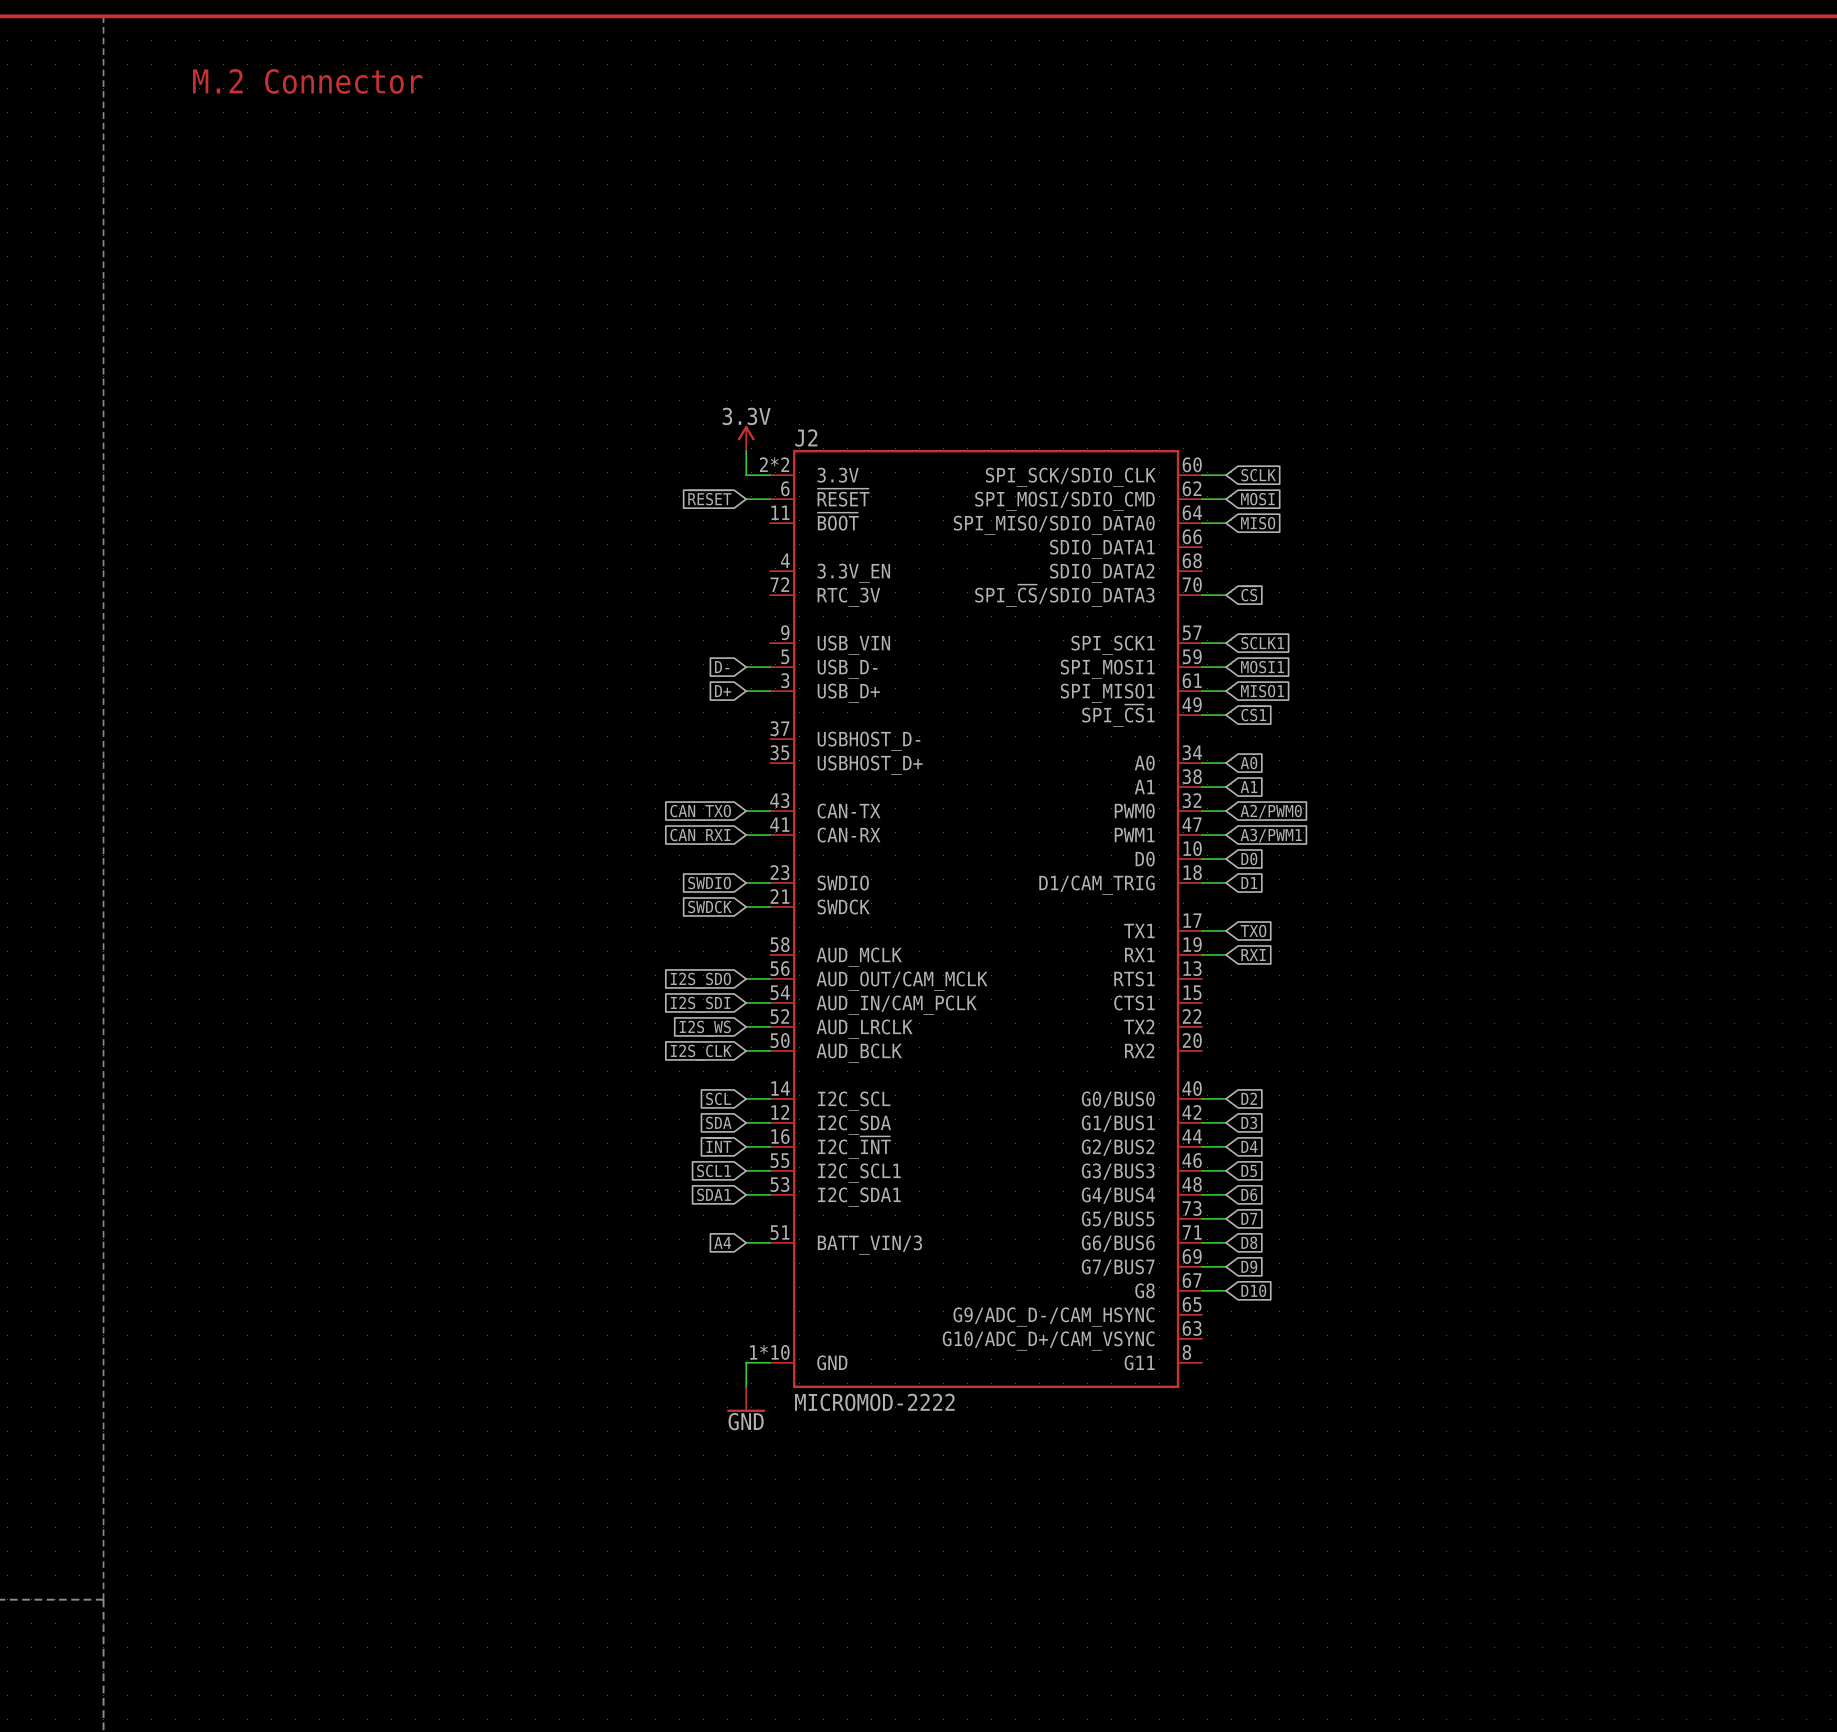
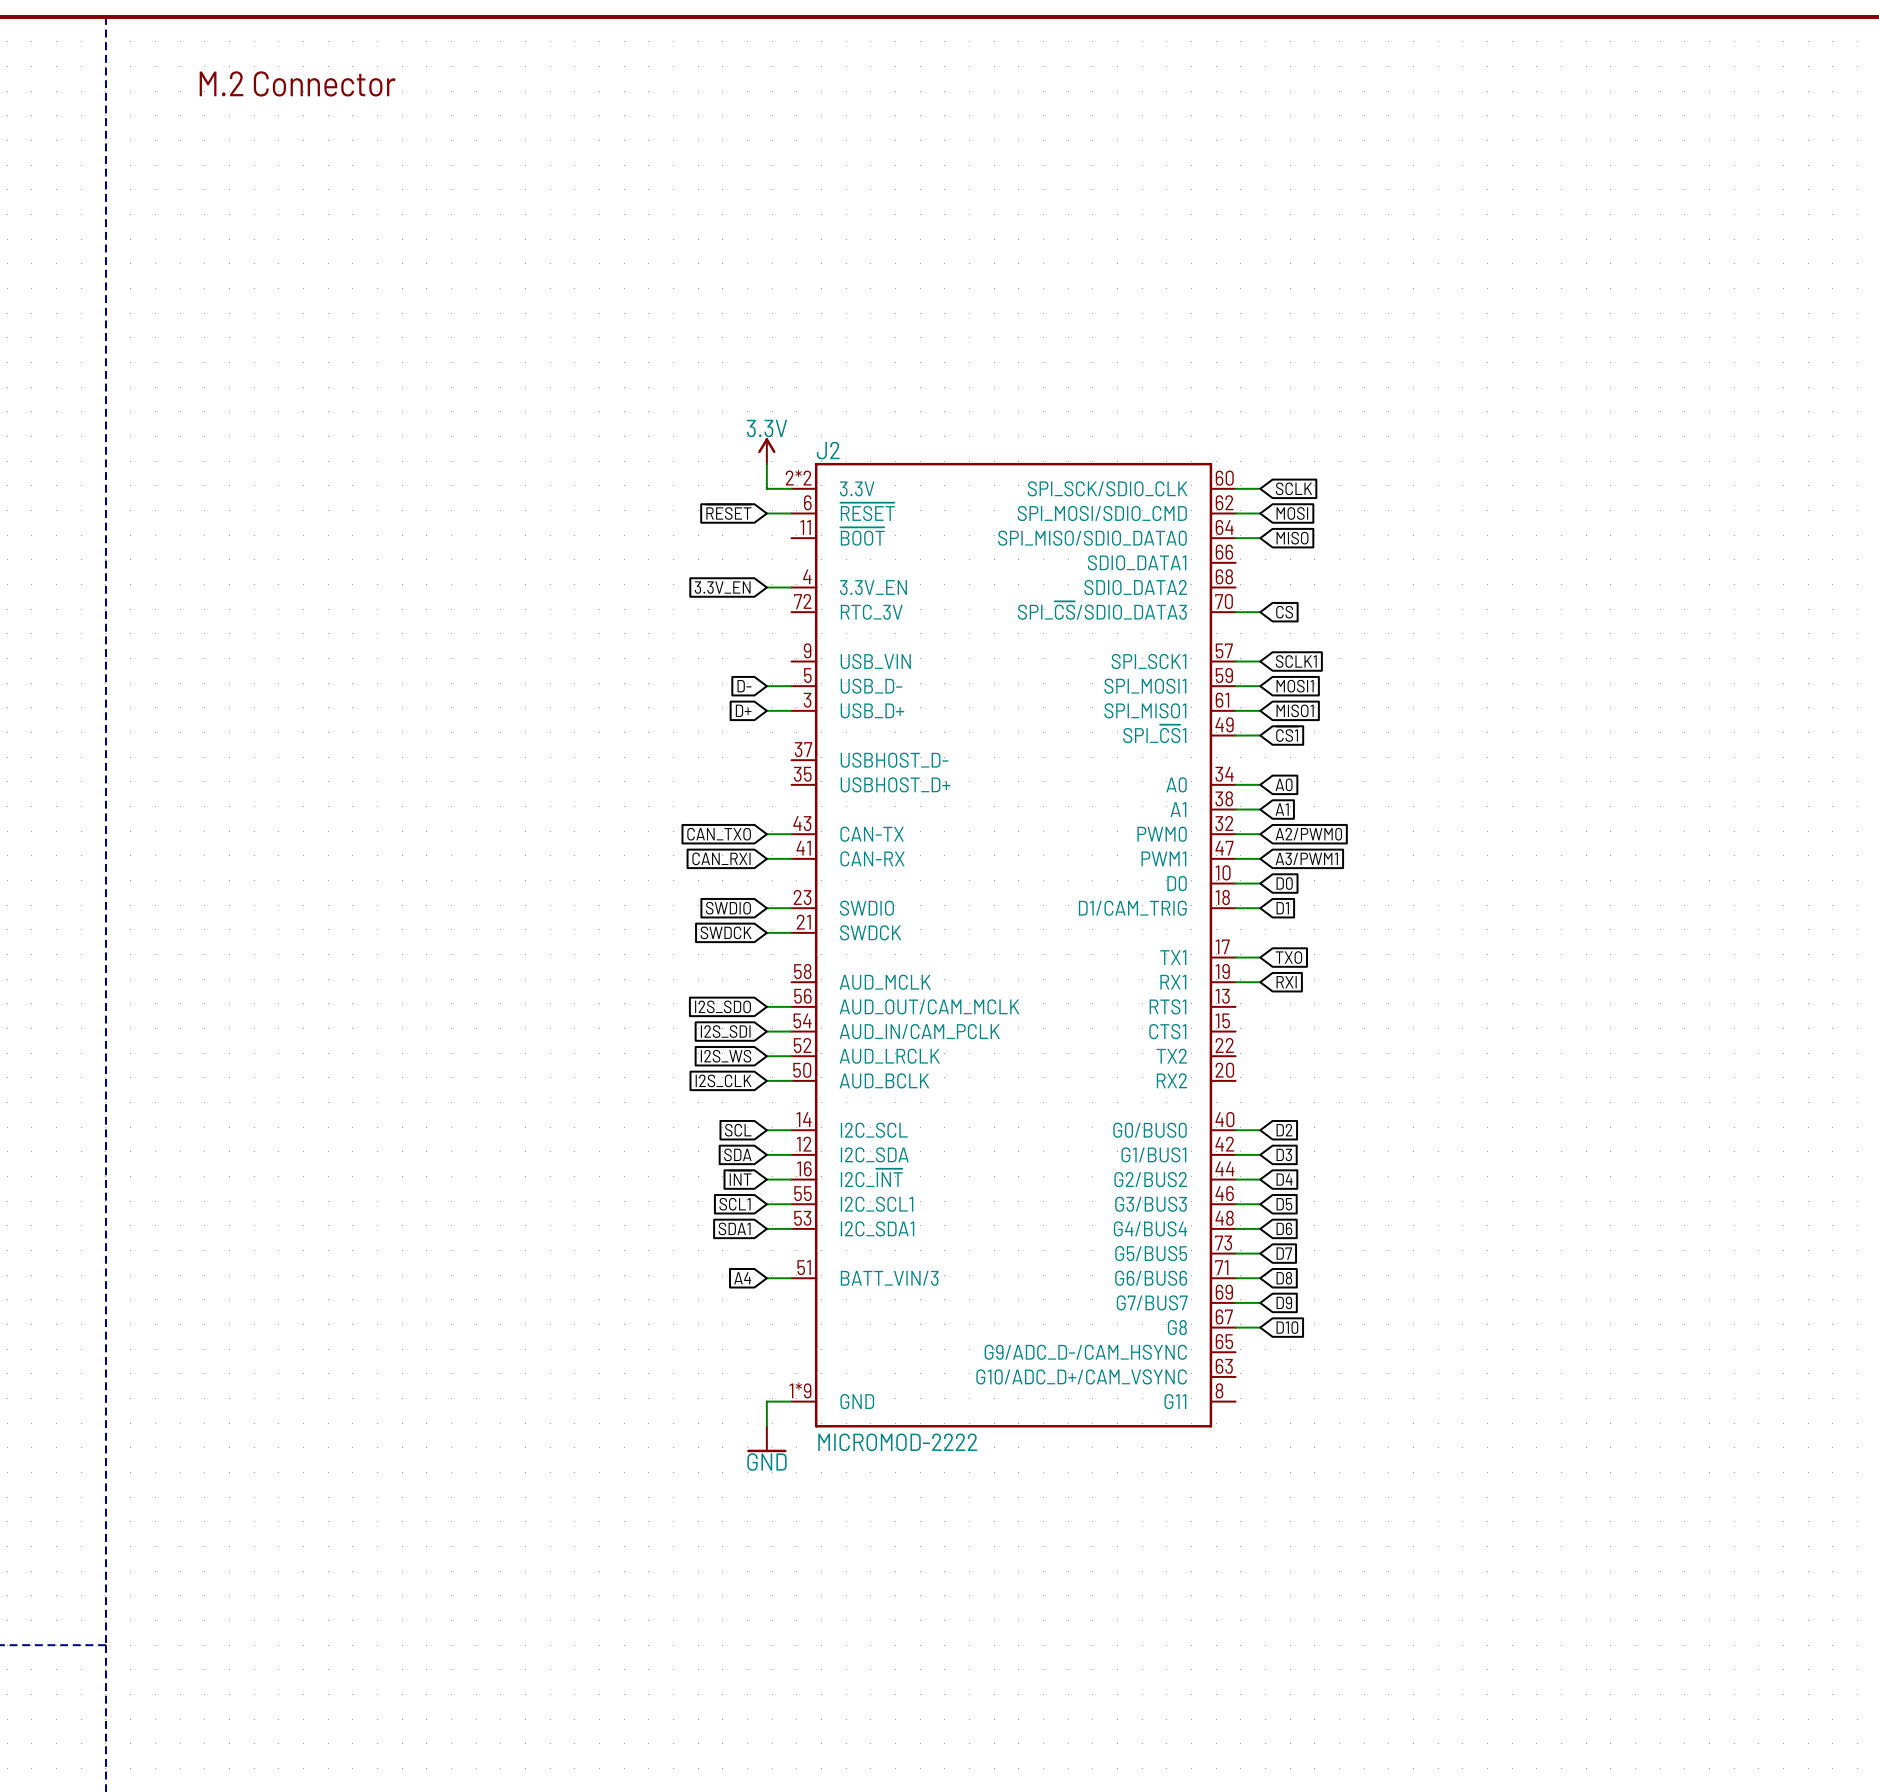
wire: none -> (766, 587) (791, 587)
global label: none -> 3.3V_EN (722, 587)
J2 pin number: 1*10 (769, 1352) -> 1*9 (800, 1390)

